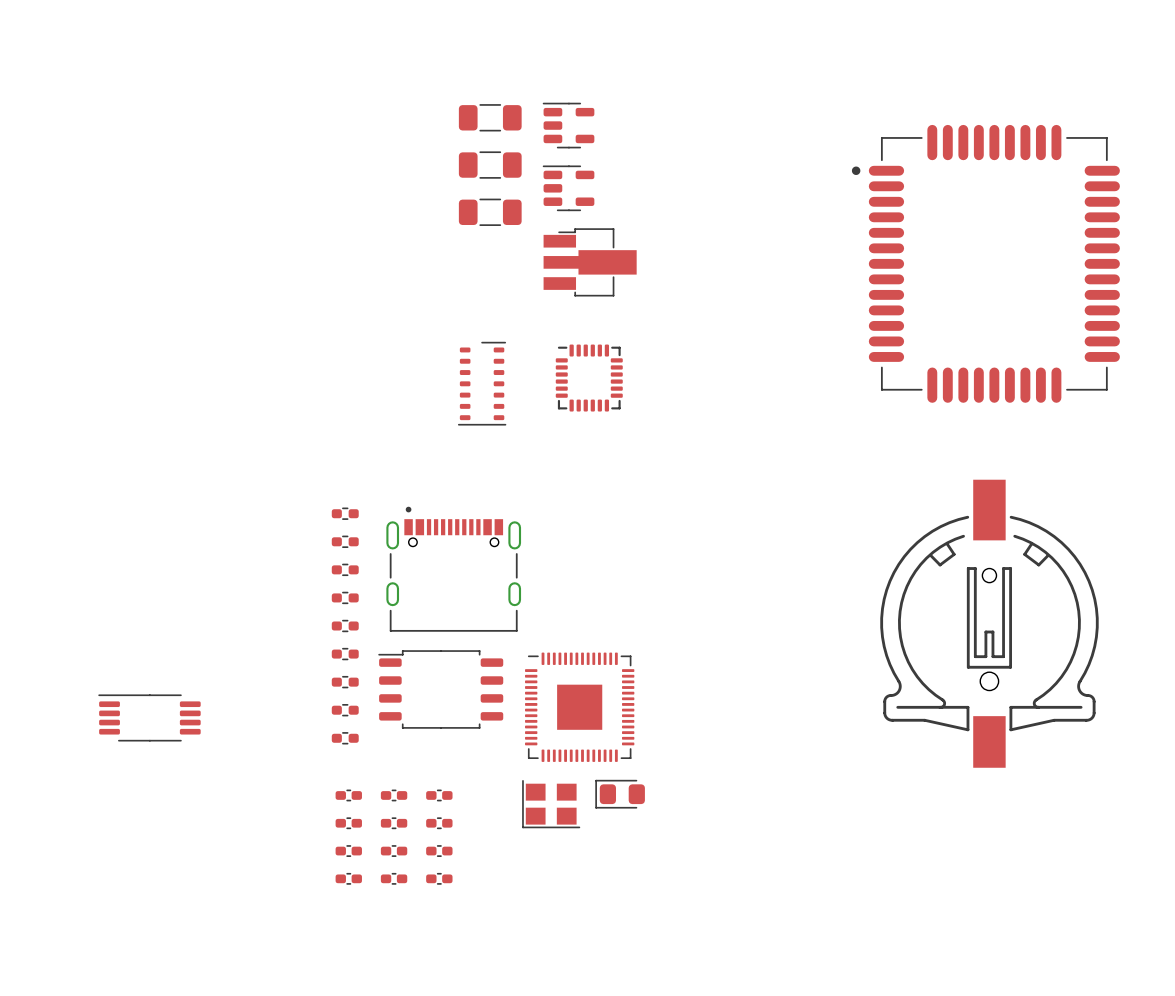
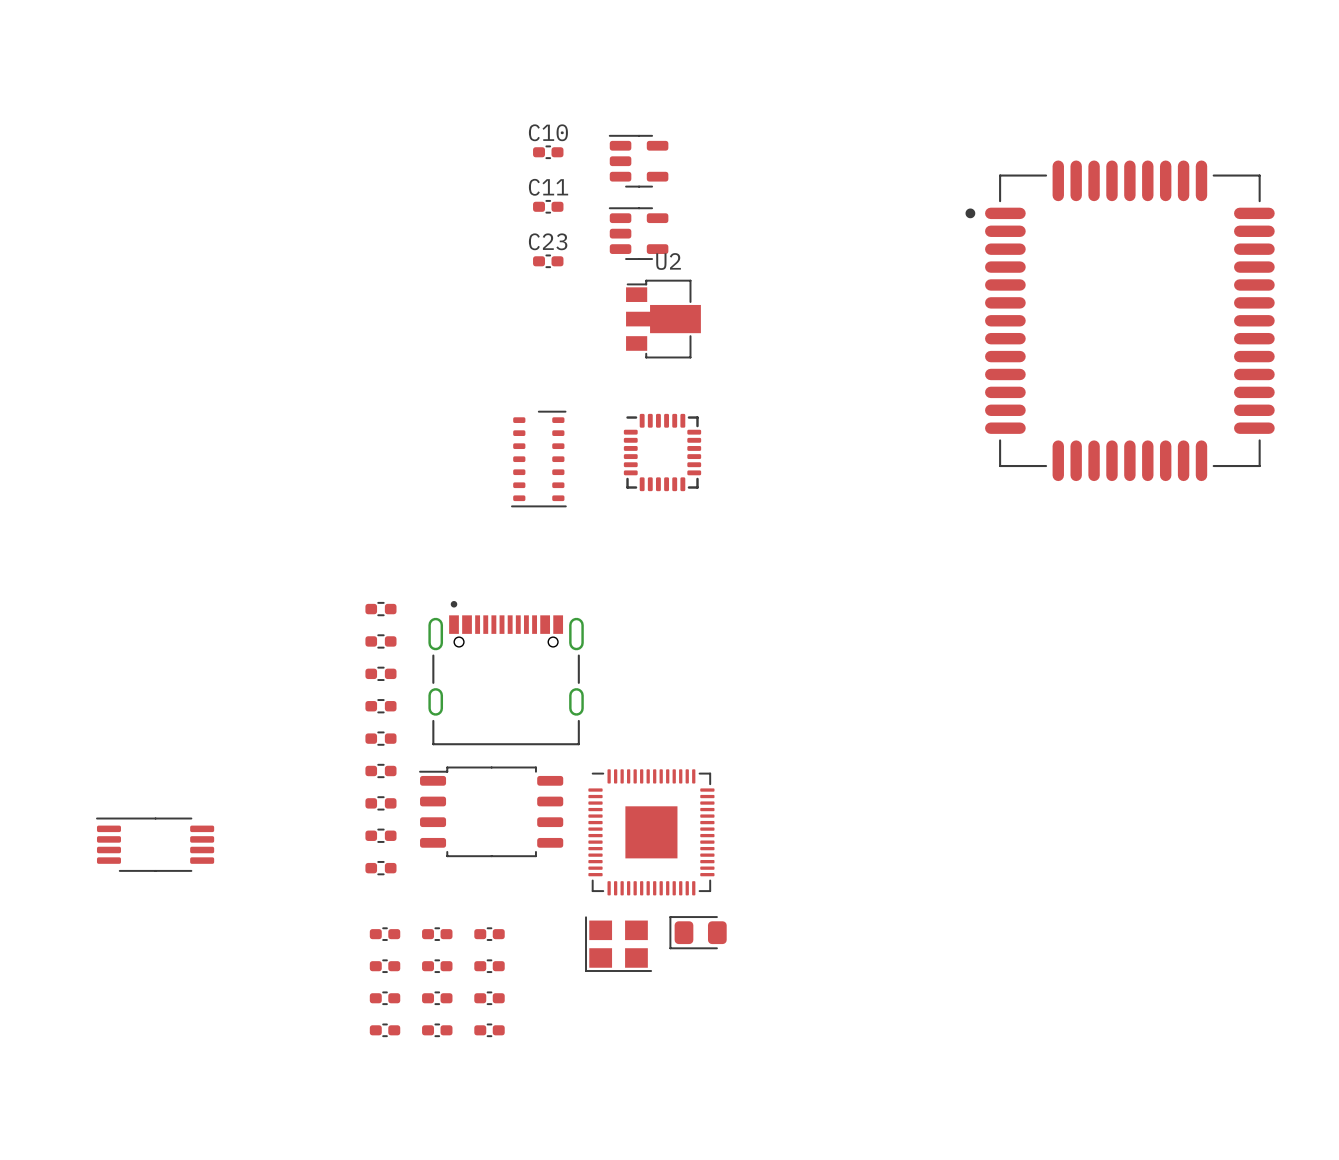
part: (490, 117) -> none
C10: none -> (548, 152)
part: (490, 165) -> none
C11: none -> (548, 206)
part: (490, 212) -> none
C23: none -> (548, 261)
part: (590, 262) -> none
U2: none -> (663, 319)
part: (989, 623) -> none

